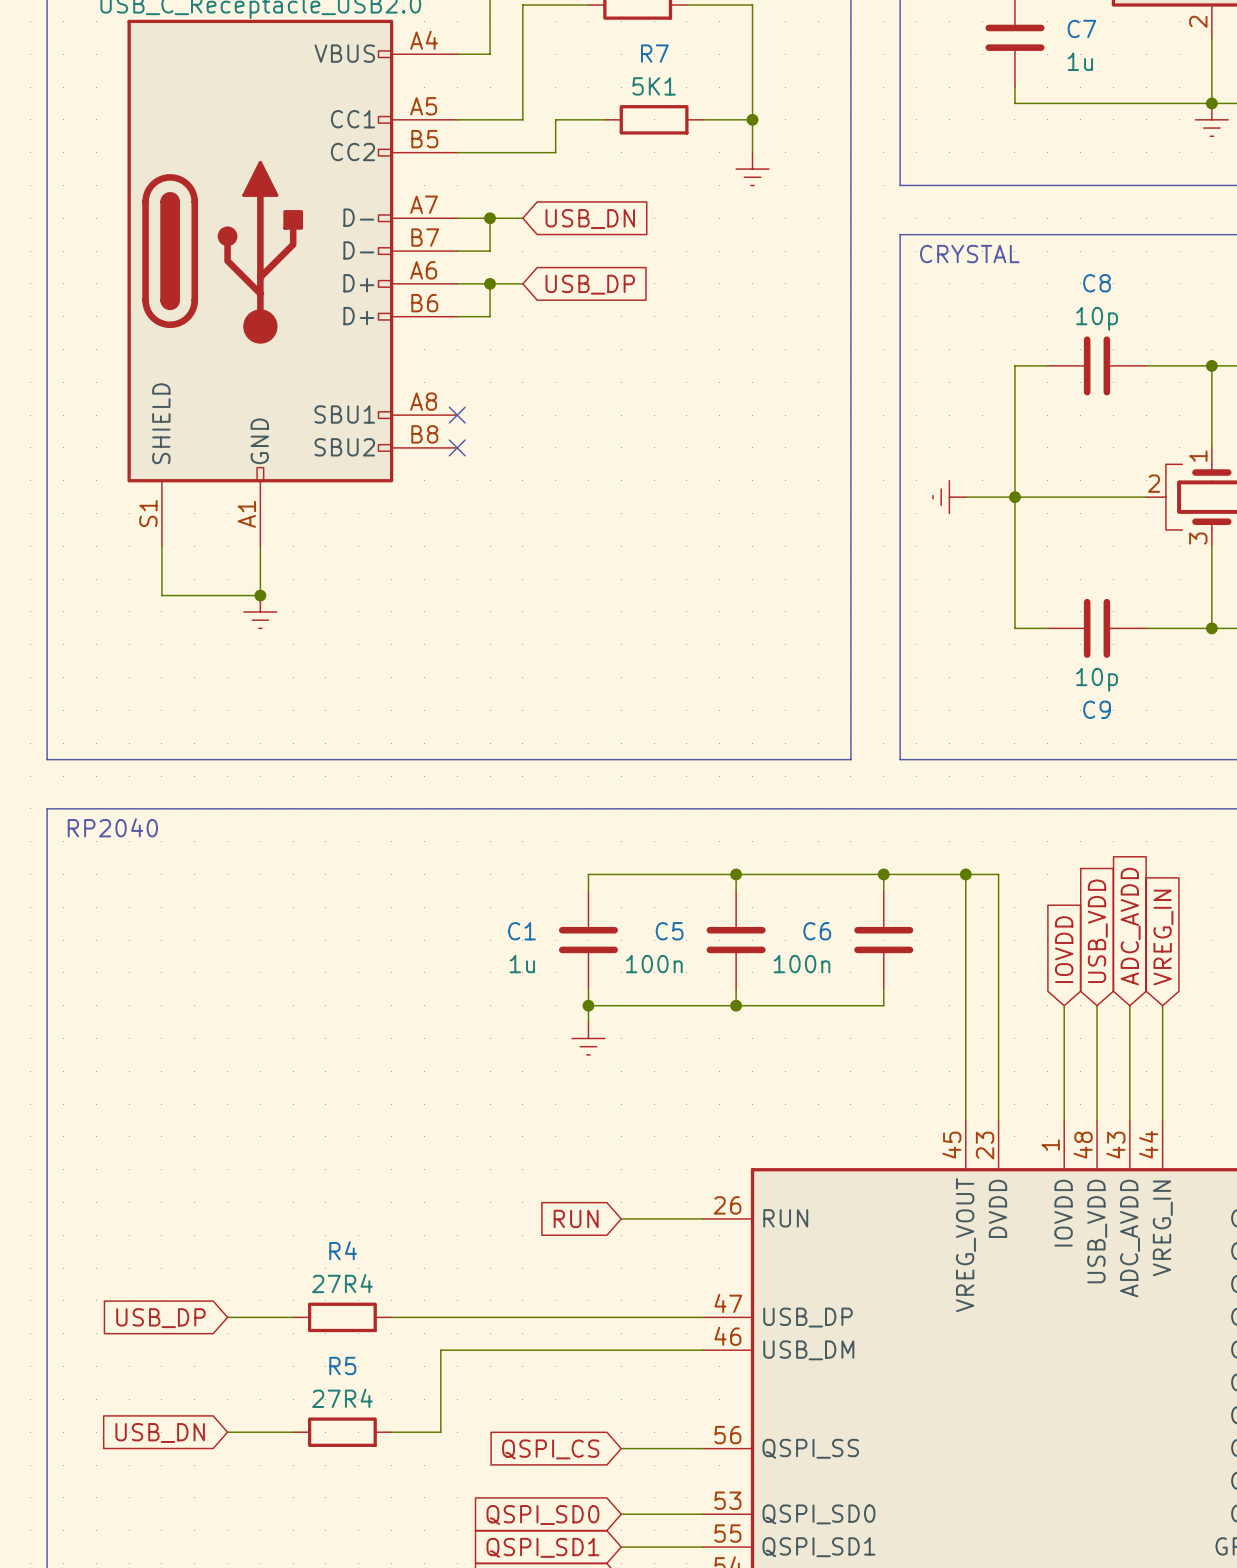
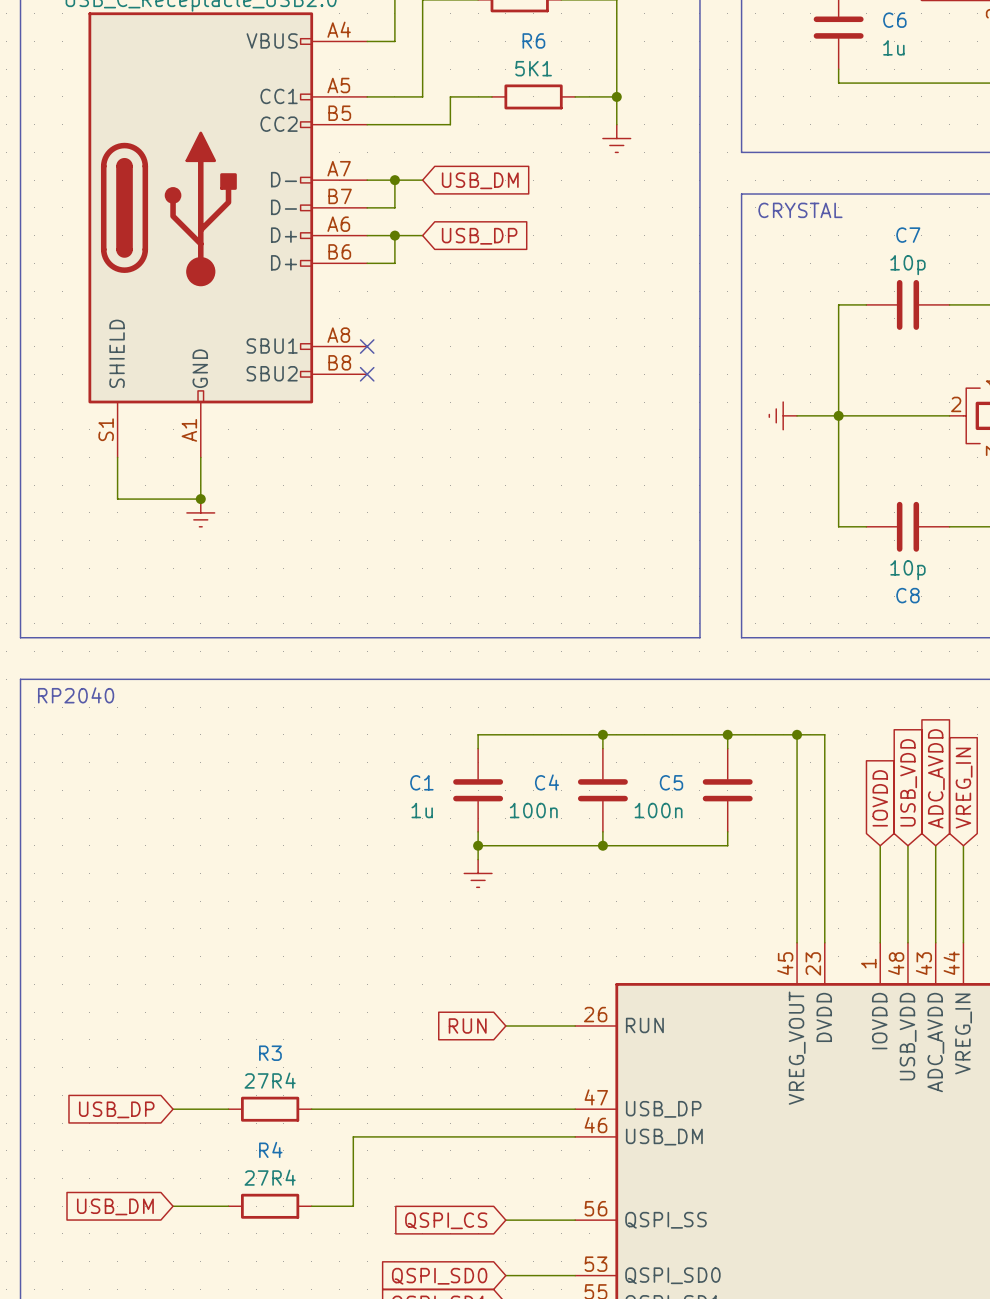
C7 name: C7 (1081, 28) -> C6 (894, 20)
R7 name: R7 (654, 53) -> R6 (533, 40)
global label: USB_DN (590, 219) -> USB_DM (480, 180)
C8 name: C8 (1097, 283) -> C7 (908, 235)
C9 name: C9 (1097, 709) -> C8 (907, 595)
C5 name: C5 (669, 931) -> C4 (547, 782)
C6 name: C6 (817, 931) -> C5 (671, 782)
R4 name: R4 (343, 1250) -> R3 (270, 1053)
R5 name: R5 (342, 1365) -> R4 (270, 1149)
global label: USB_DN (160, 1432) -> USB_DM (115, 1206)

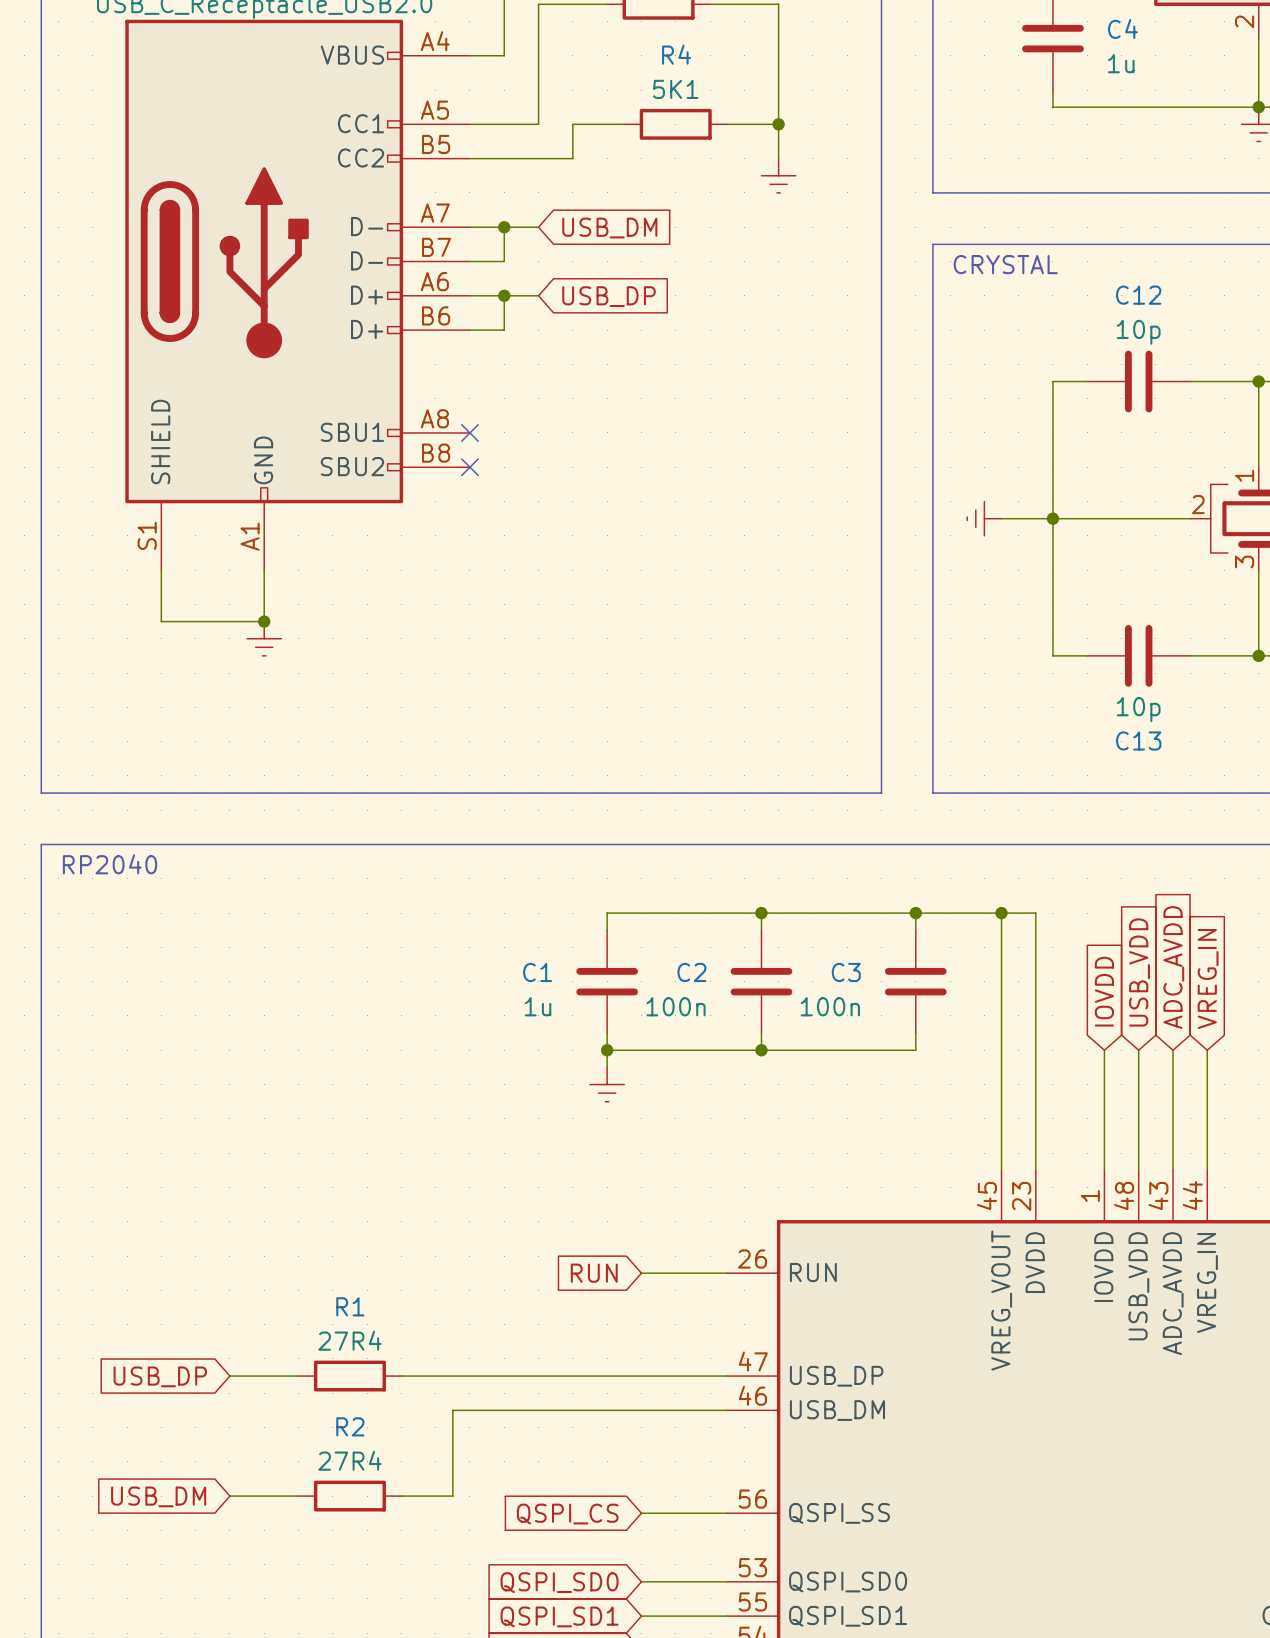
C6 name: C6 (894, 20) -> C4 (1122, 28)
R6 name: R6 (533, 40) -> R4 (676, 54)
C7 name: C7 (908, 235) -> C12 (1138, 295)
C8 name: C8 (907, 595) -> C13 (1138, 740)
C4 name: C4 (547, 782) -> C2 (691, 972)
C5 name: C5 (671, 782) -> C3 (846, 972)
R3 name: R3 (270, 1053) -> R1 (350, 1306)
R4 name: R4 (270, 1149) -> R2 (350, 1426)

